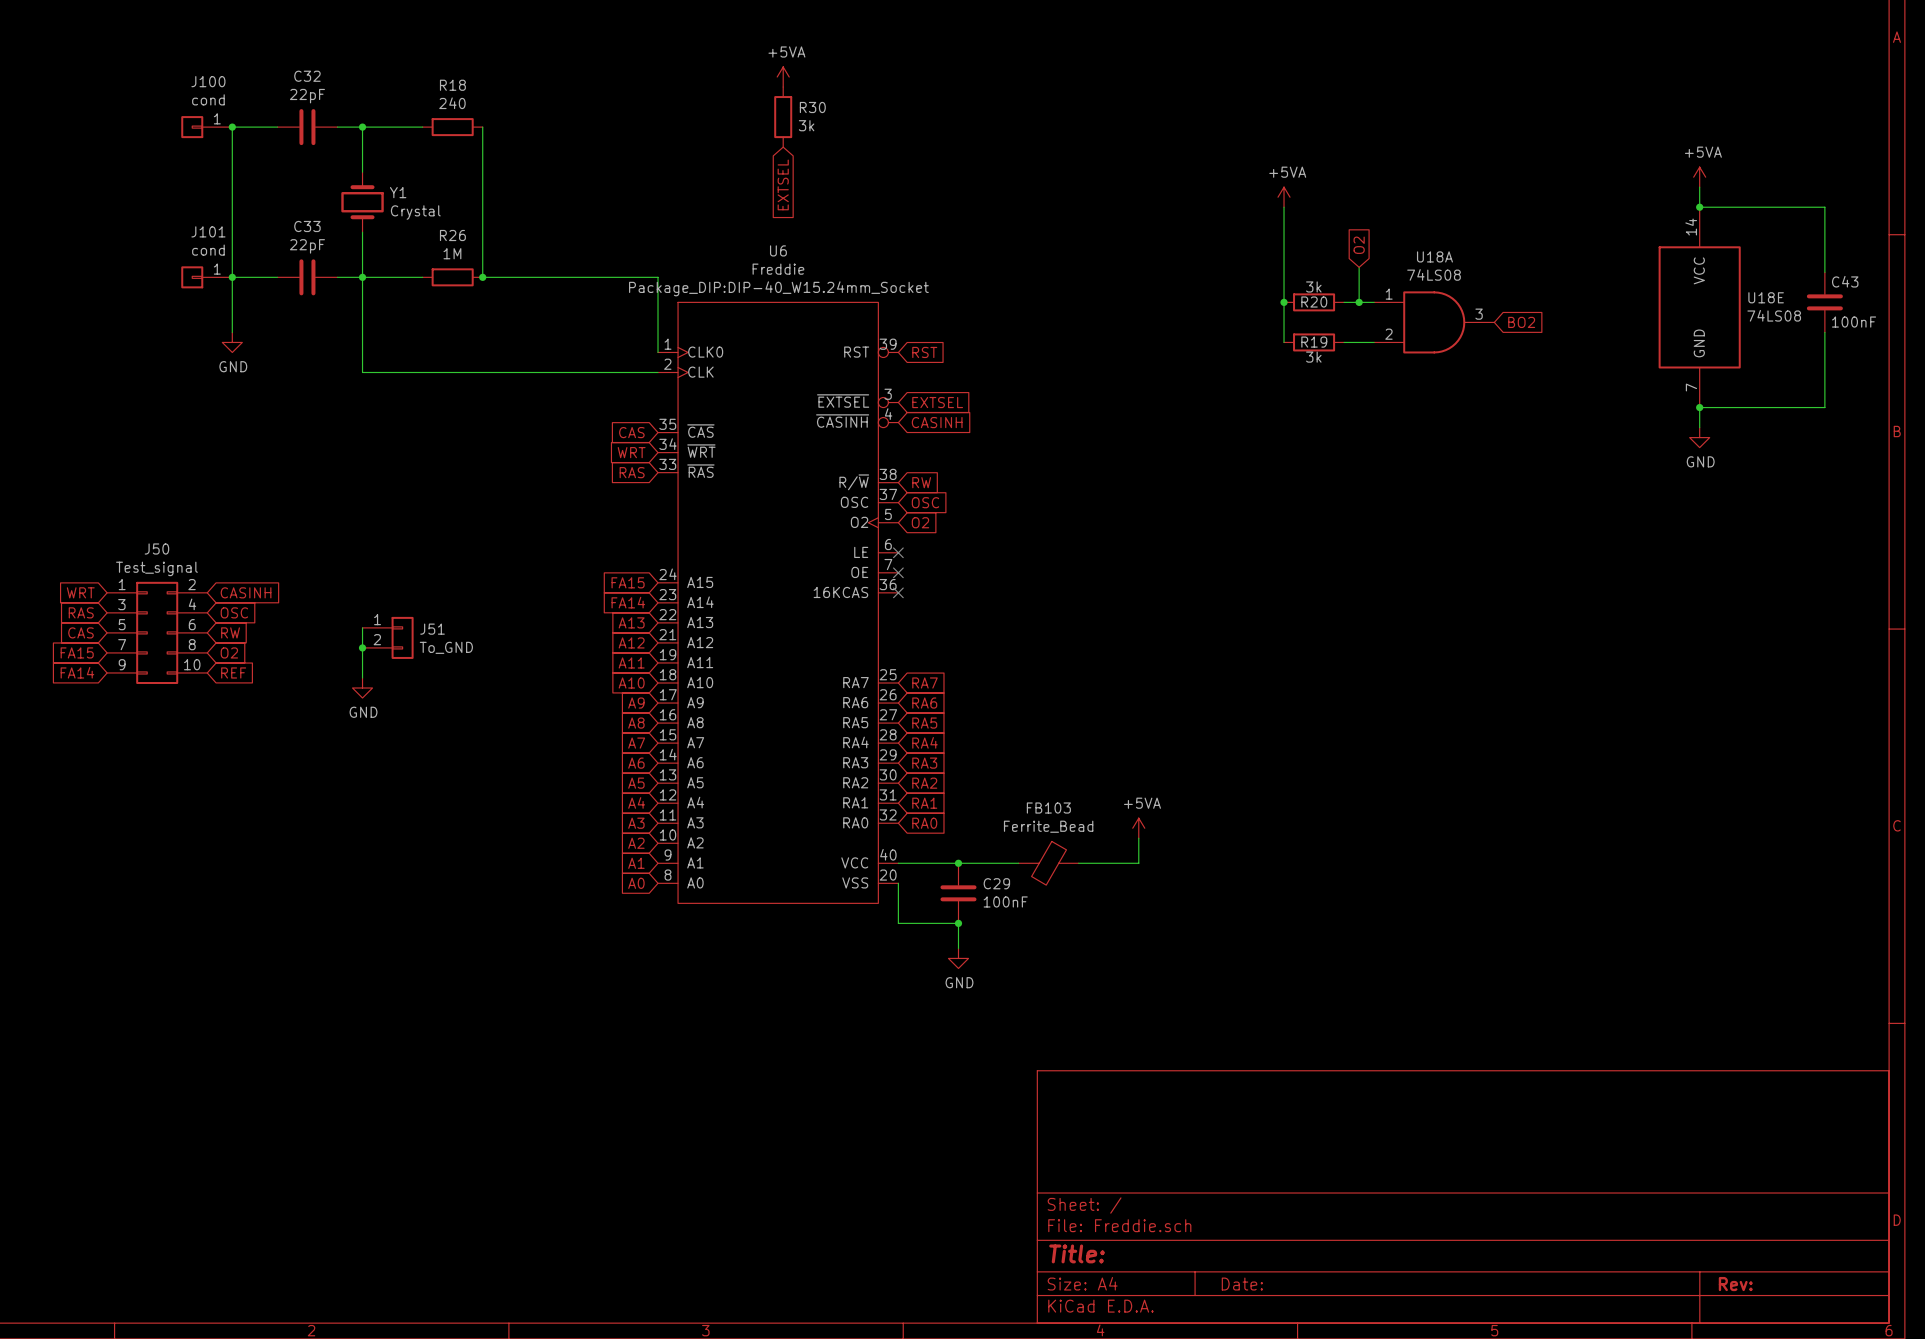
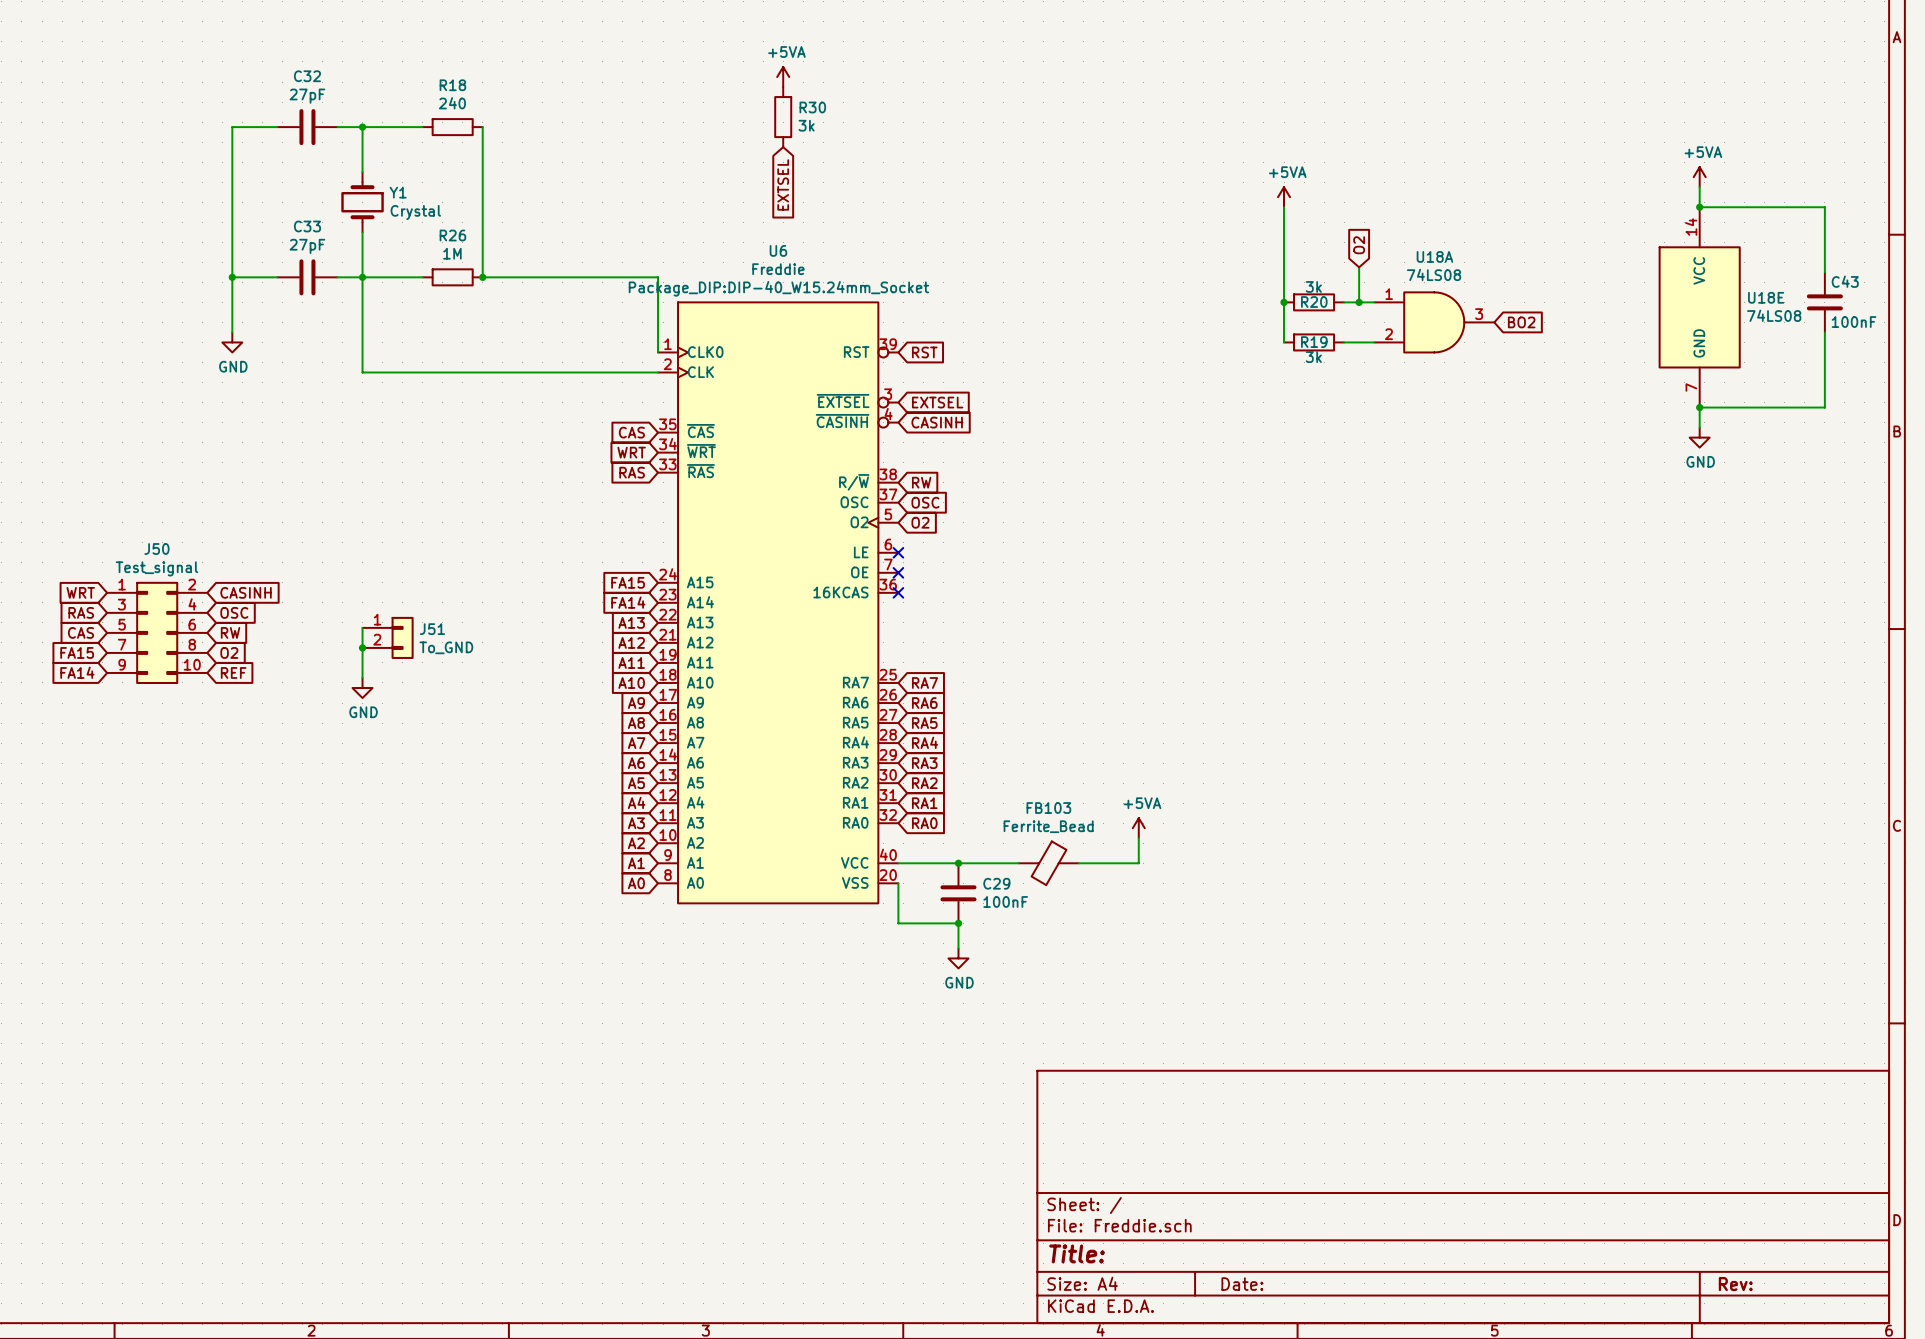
C32 value: 22pF (307, 96) -> 27pF (307, 96)
J100: cond (206, 127) -> none
junction: (232, 127) -> none
C33 value: 22pF (307, 246) -> 27pF (307, 246)
J101: cond (206, 277) -> none

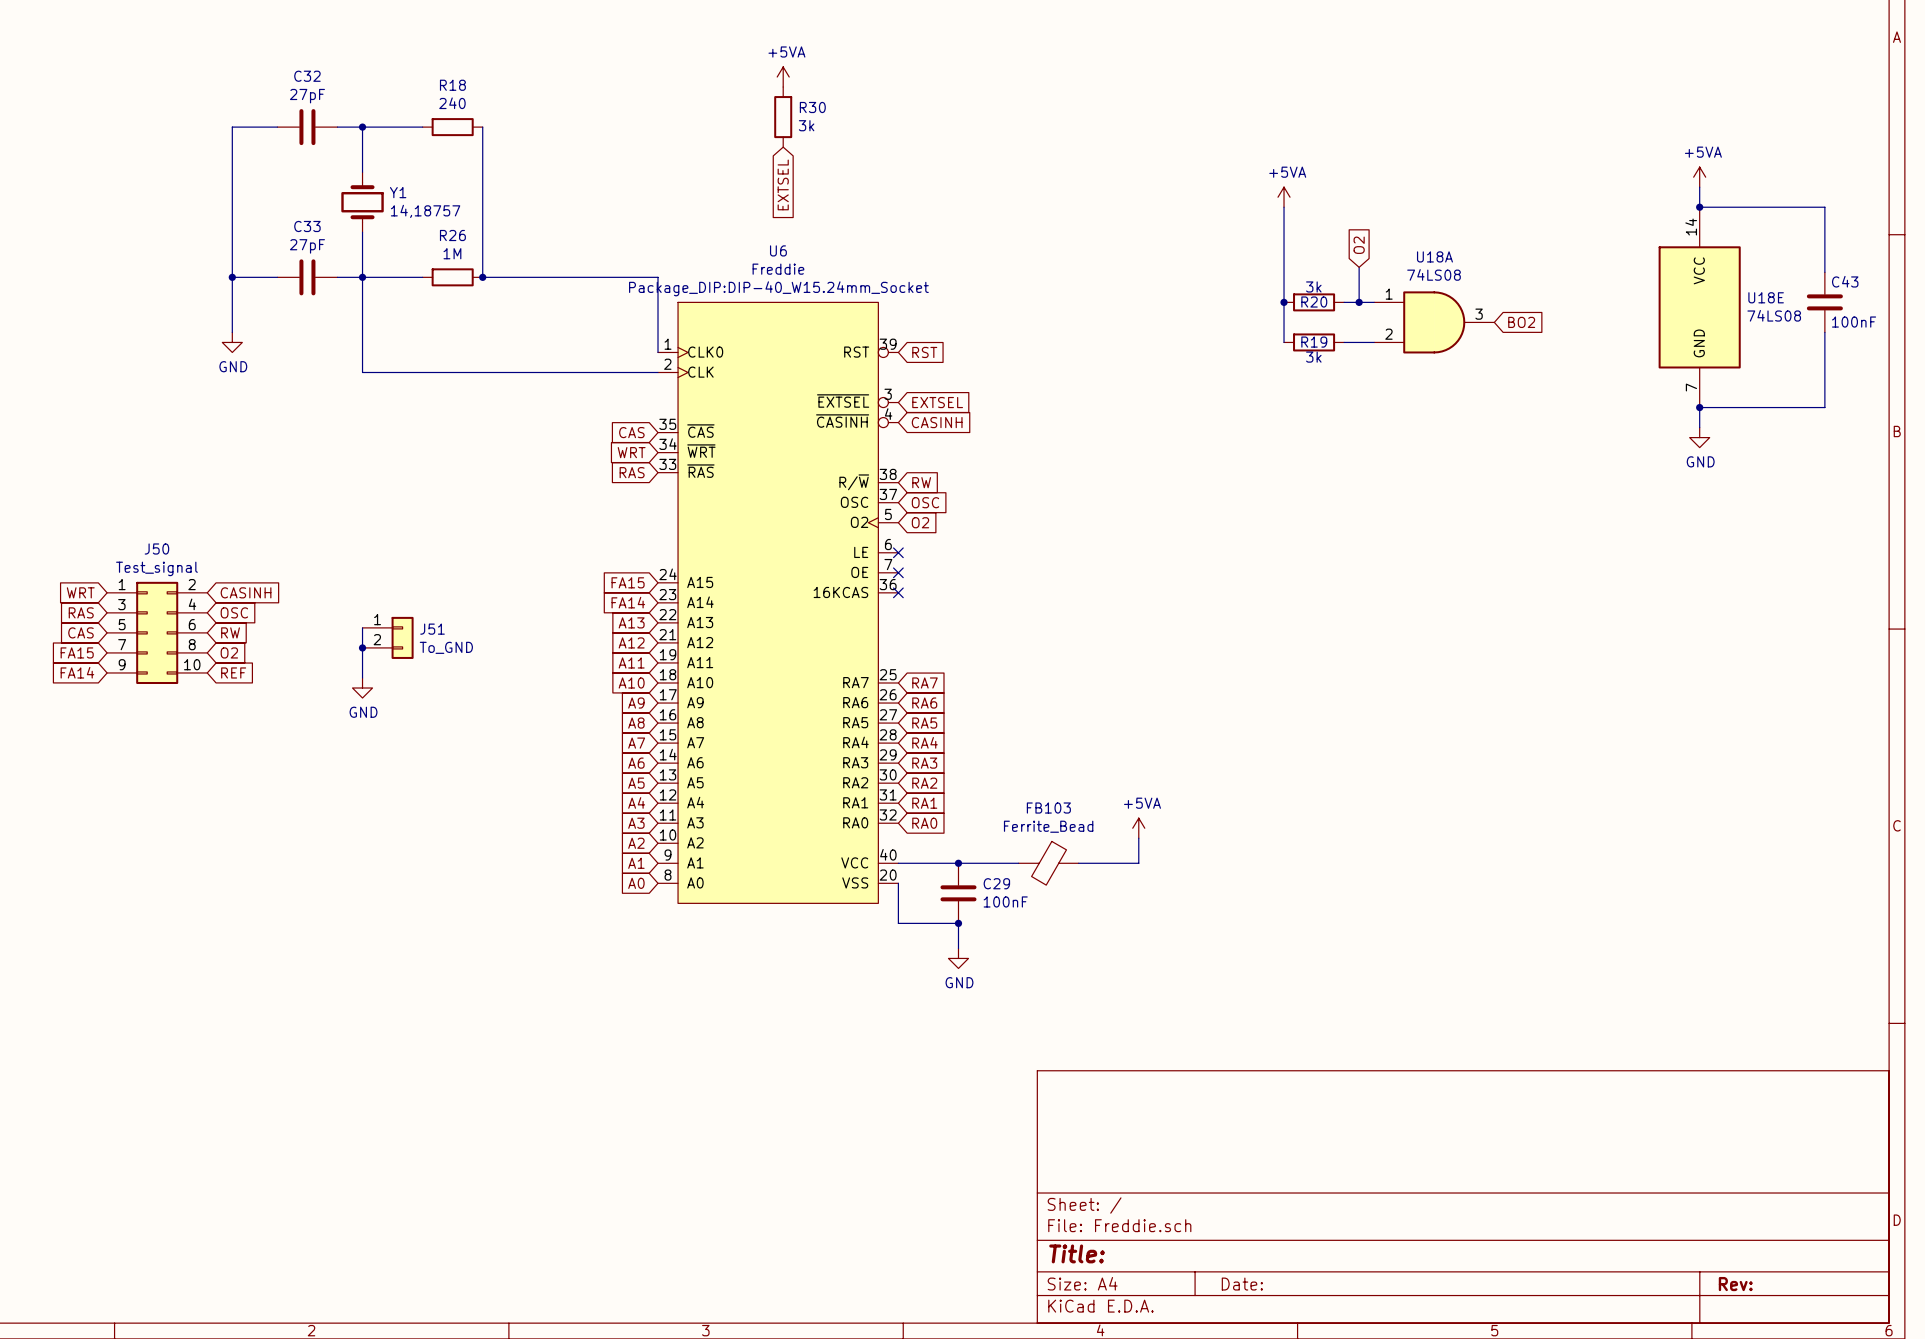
Y1 value: Crystal (415, 212) -> 14,18757 (425, 211)

